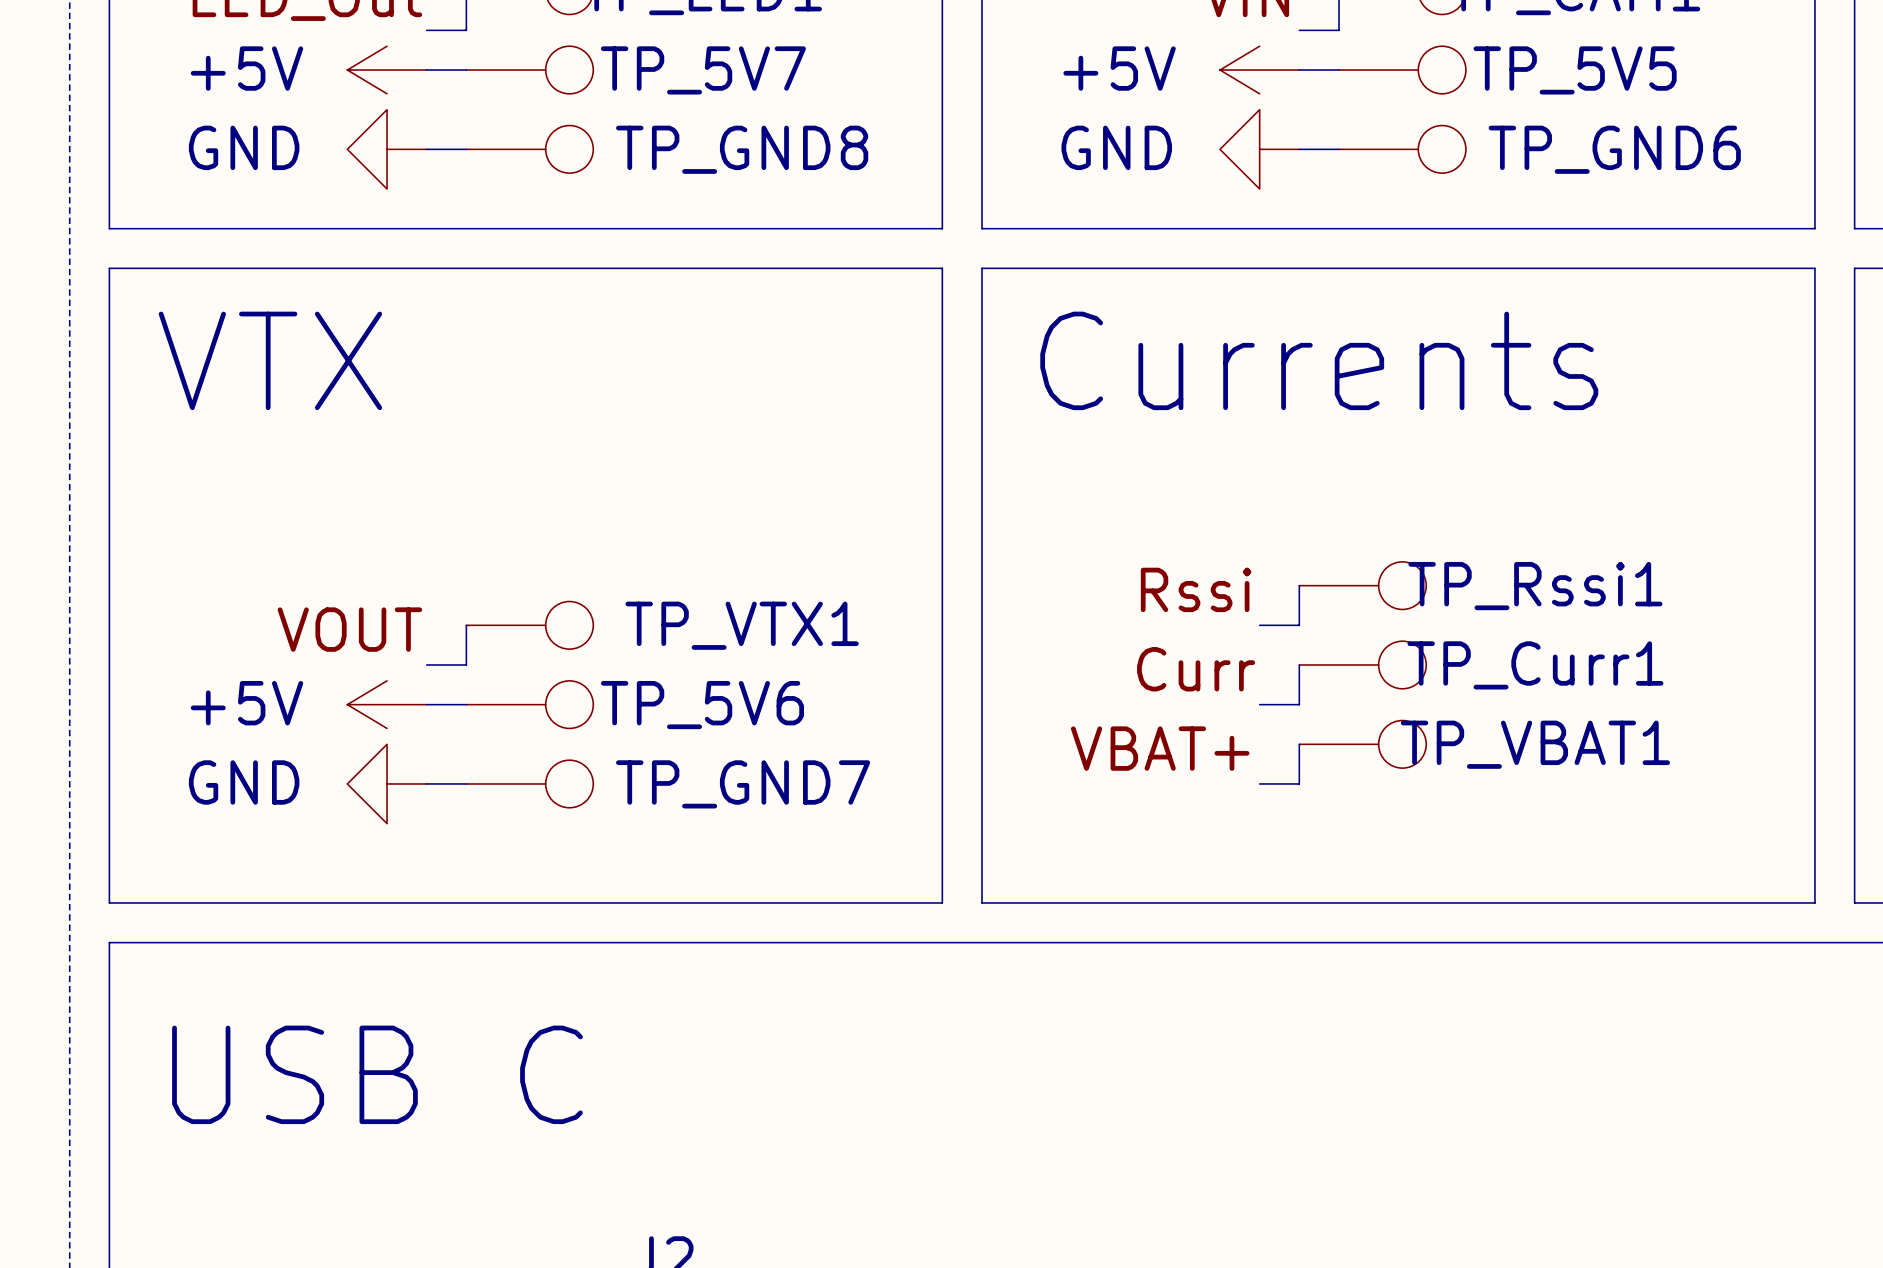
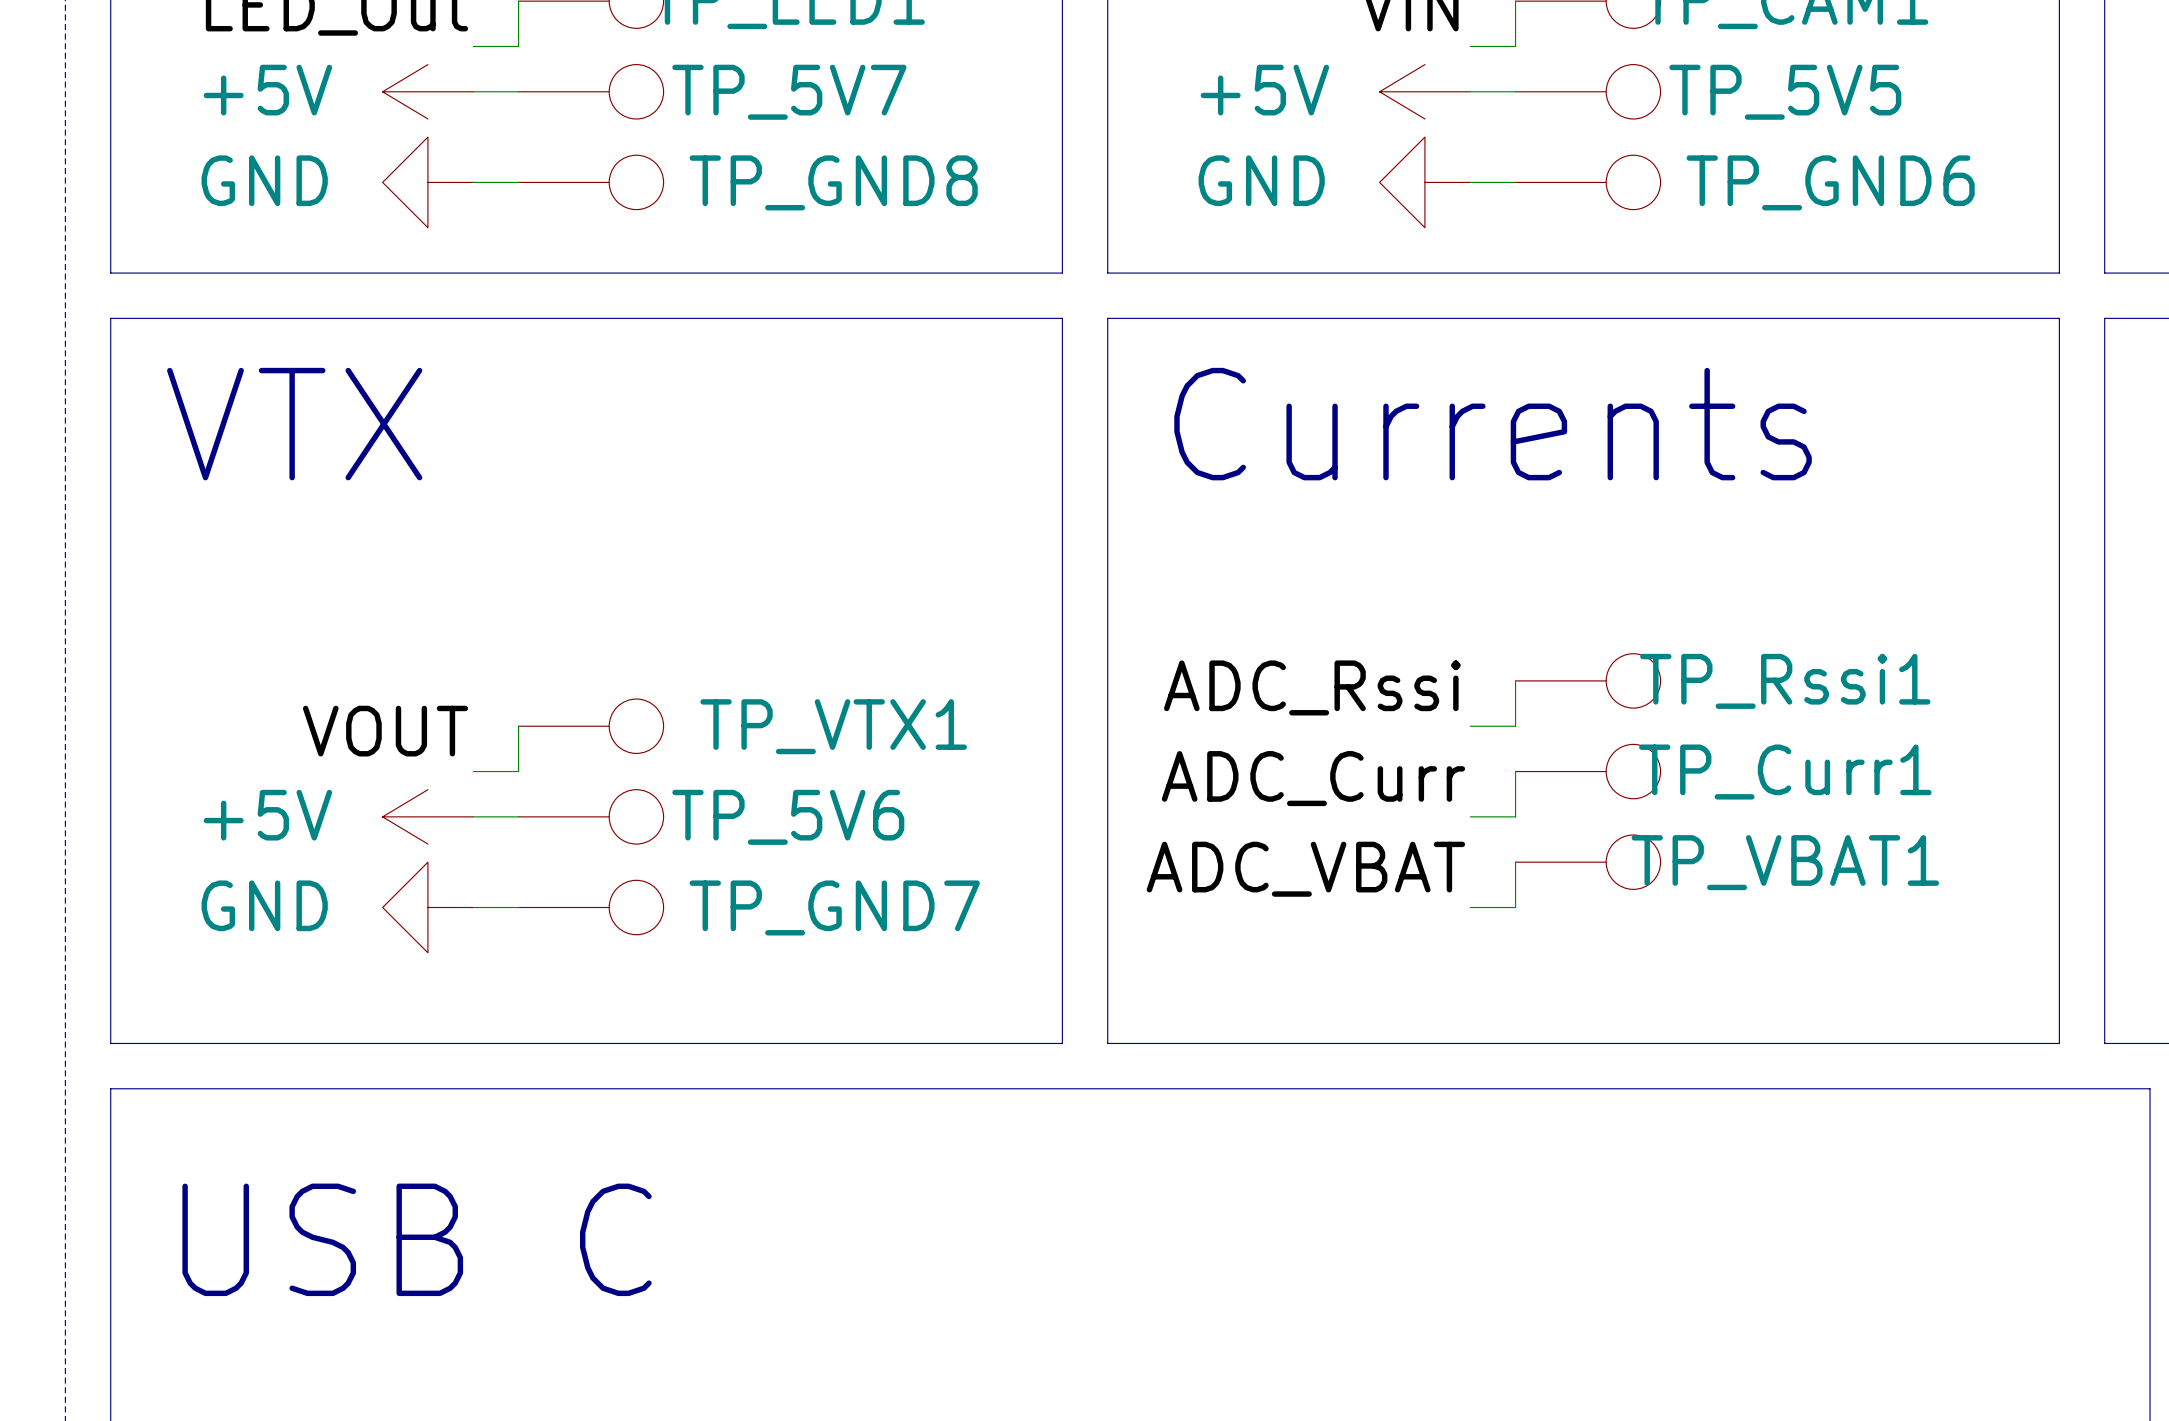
wire: (1299, 585) (1299, 625) (1259, 625) -> (1515, 680) (1515, 726) (1470, 726)
TP_Rssi1 position: (1362, 585) -> (1588, 680)
label: Rssi (1196, 589) -> ADC_Rssi (1312, 687)
wire: (1299, 664) (1299, 704) (1259, 704) -> (1515, 771) (1515, 816) (1470, 816)
TP_Curr1 position: (1362, 664) -> (1588, 771)
label: Curr (1196, 669) -> ADC_Curr (1313, 778)
wire: (1299, 744) (1299, 783) (1259, 783) -> (1515, 862) (1515, 907) (1470, 907)
TP_VBAT1 position: (1362, 744) -> (1588, 862)
label: VBAT+ (1160, 748) -> ADC_VBAT (1305, 869)

